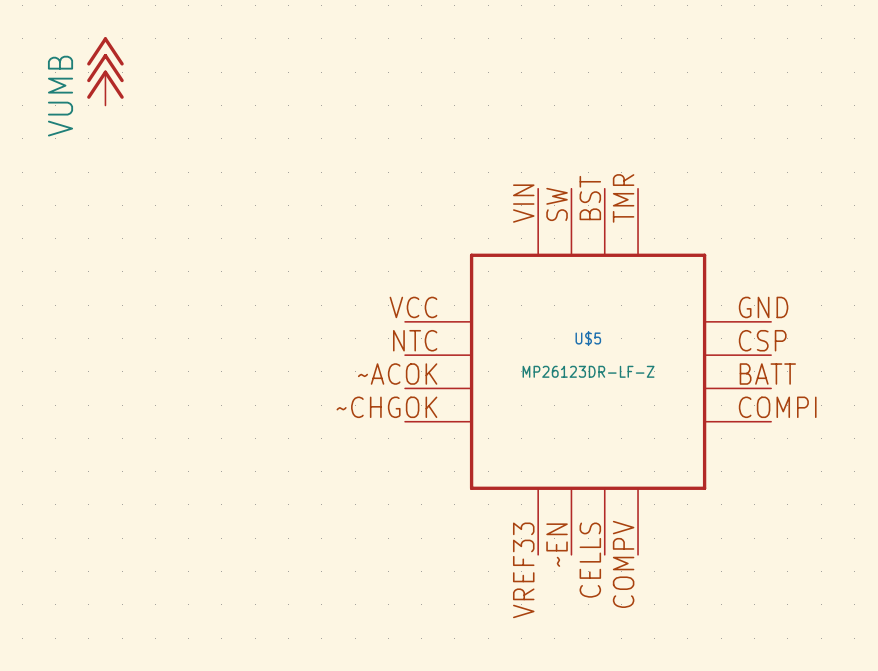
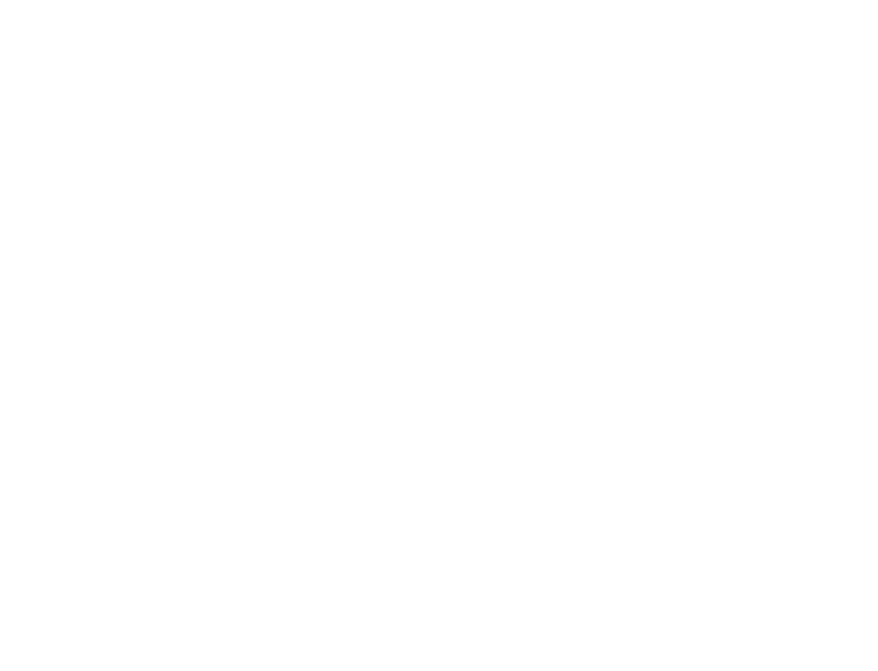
power symbol: VUMB (105, 71) -> none
U$5: MP26123DR-LF-Z (588, 371) -> none

